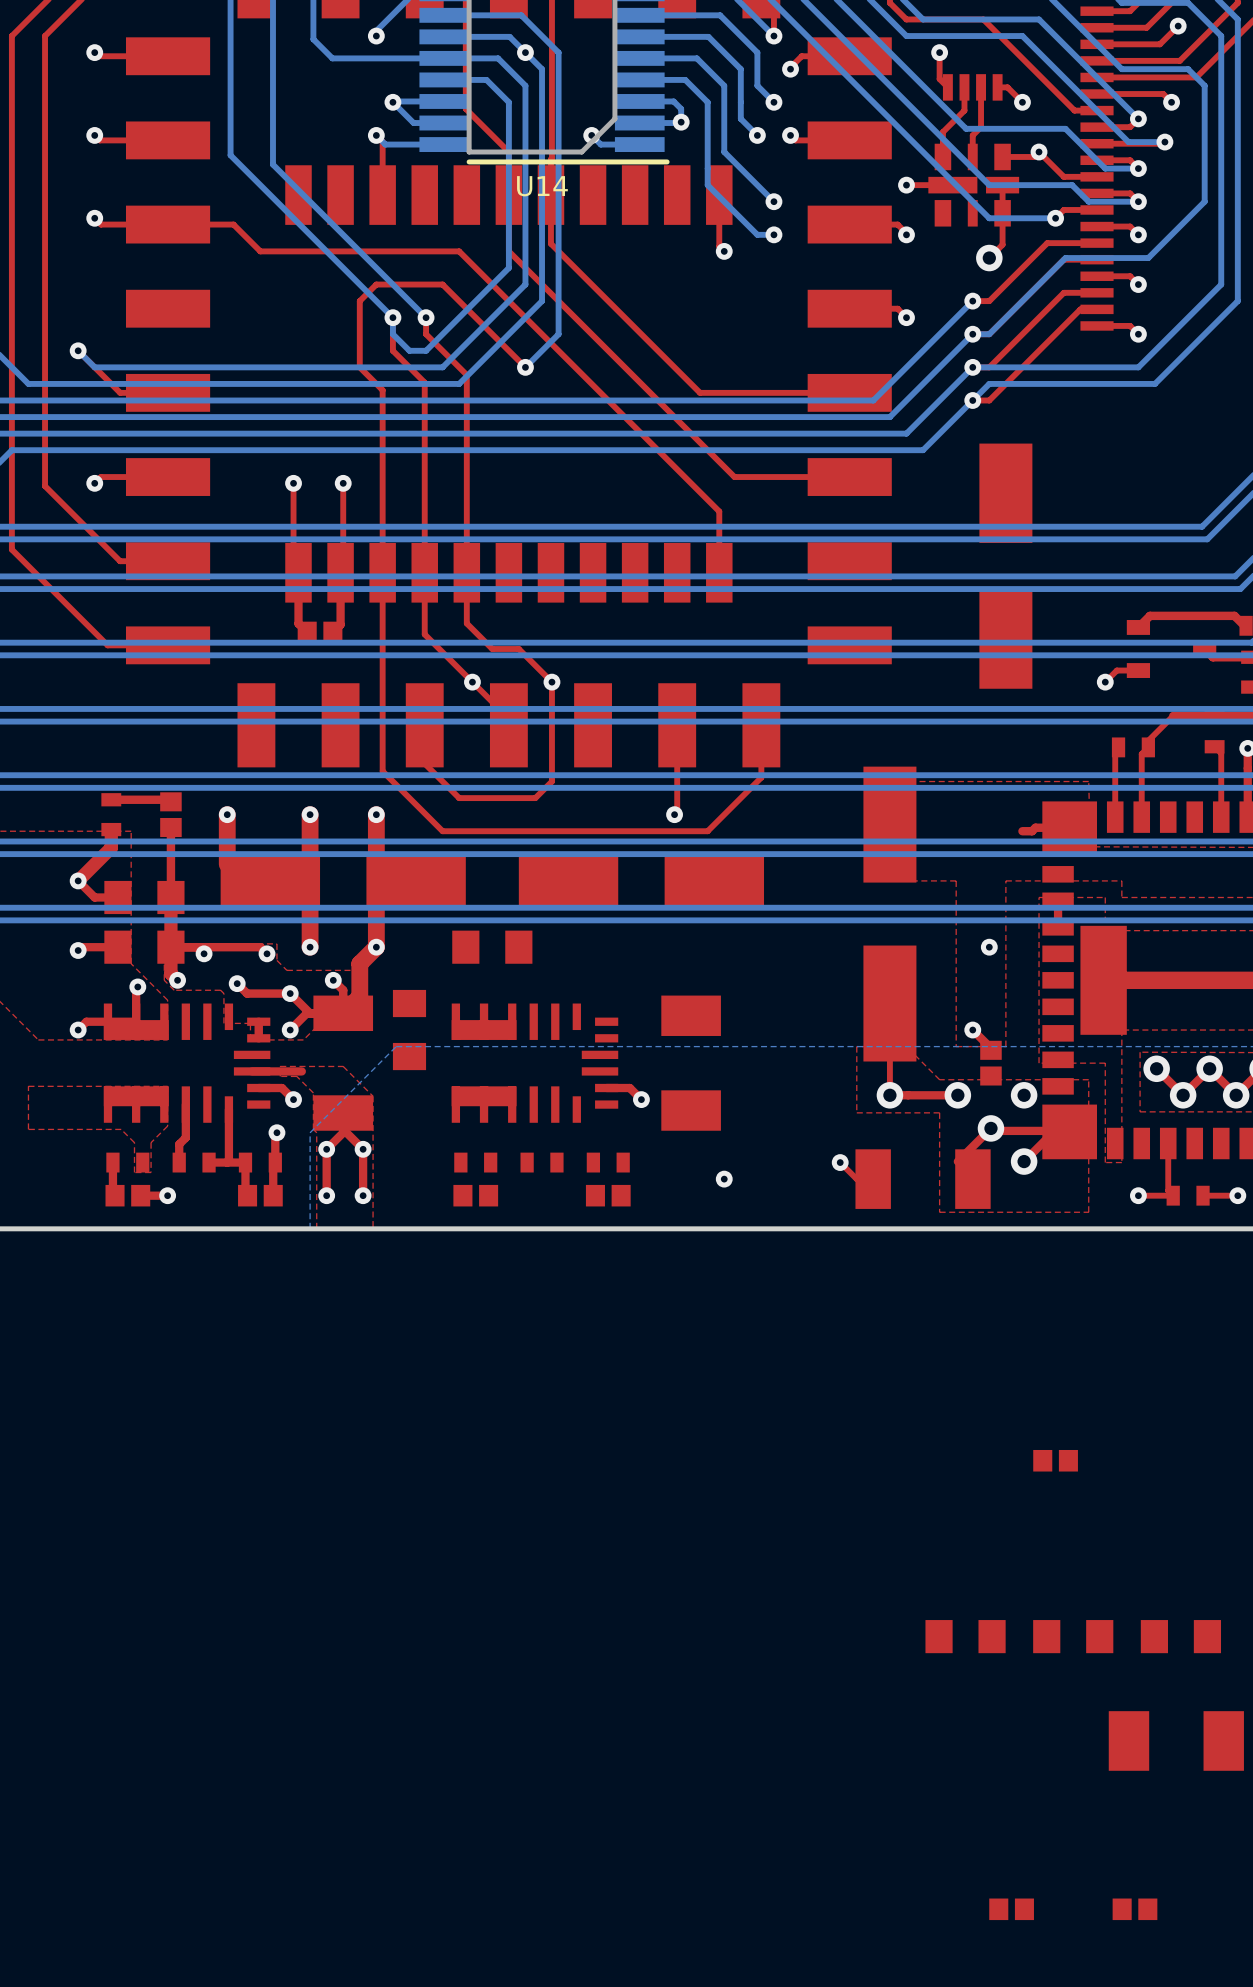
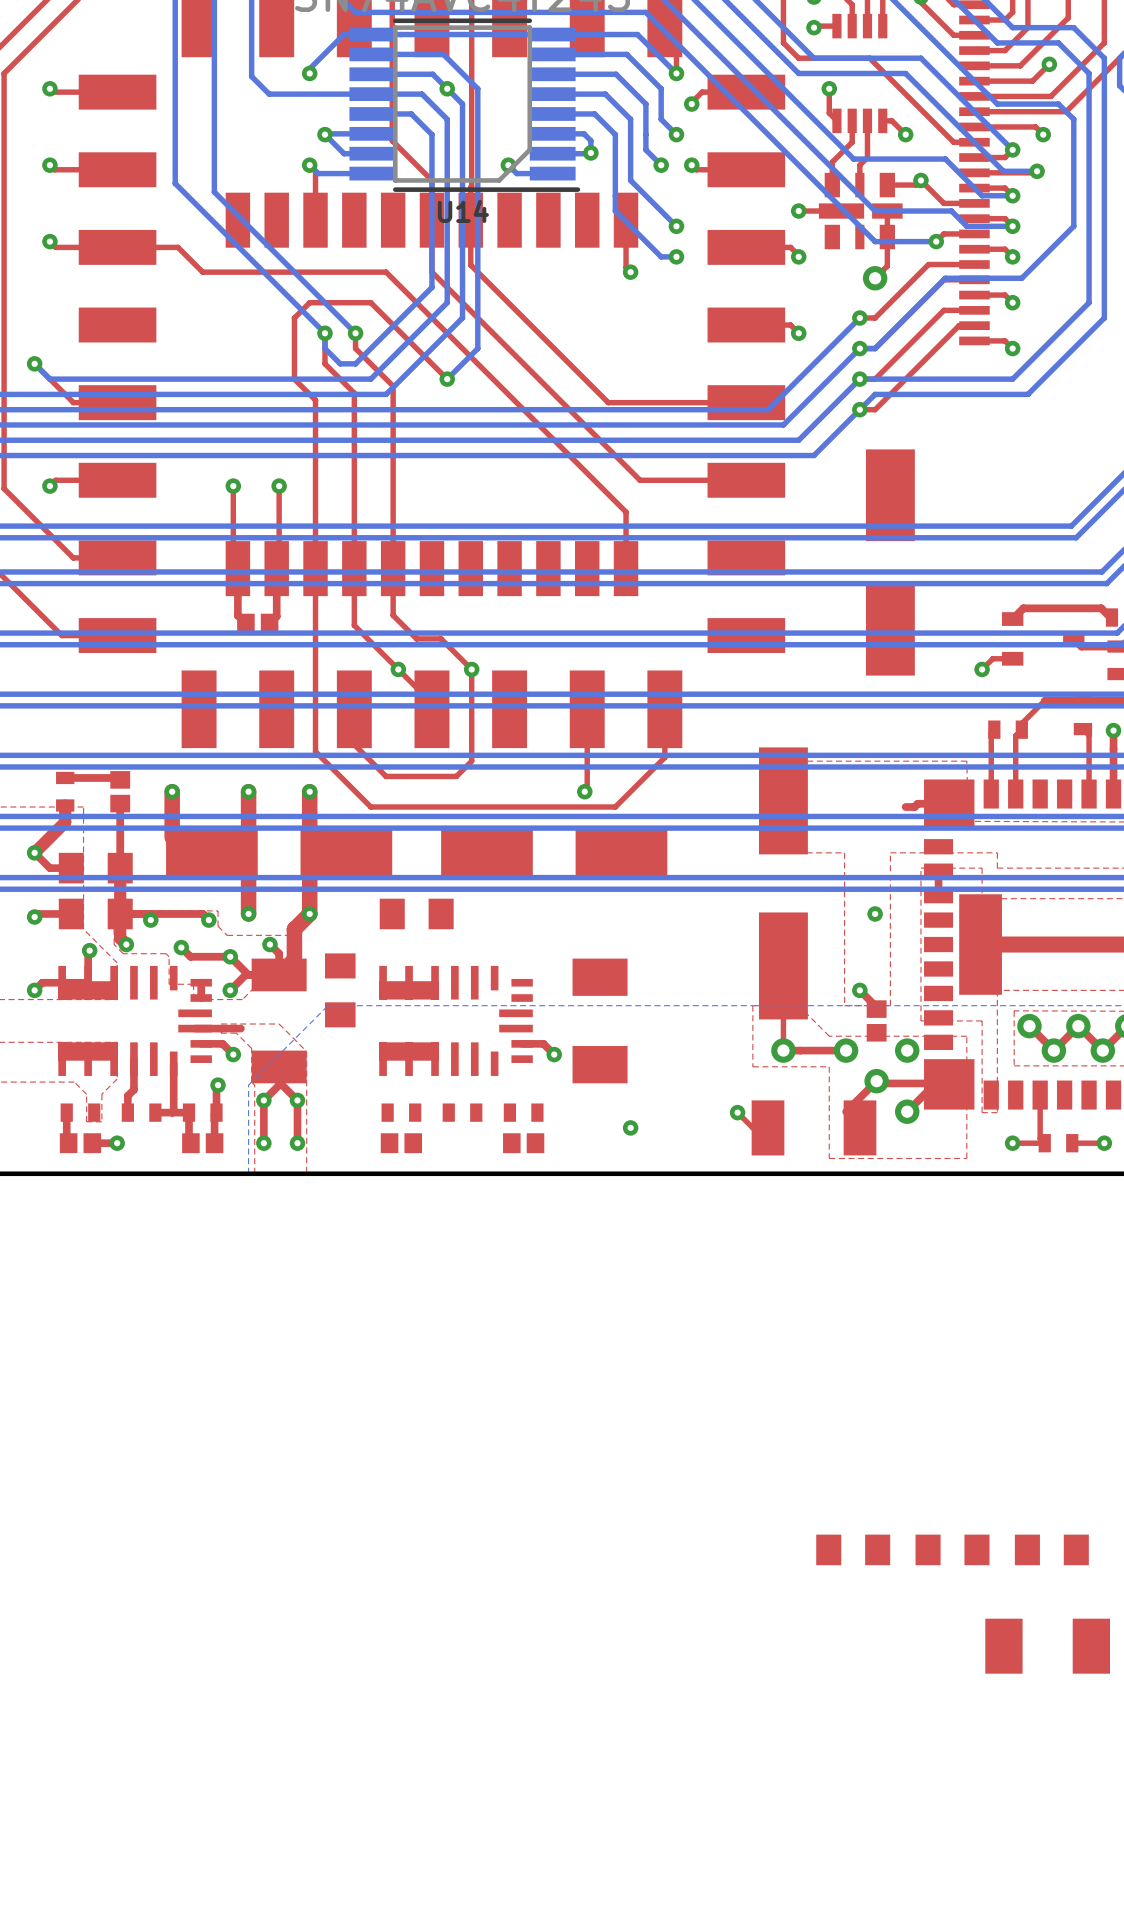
part: (1055, 1460) -> none
part: (1011, 1909) -> none
part: (1134, 1909) -> none

